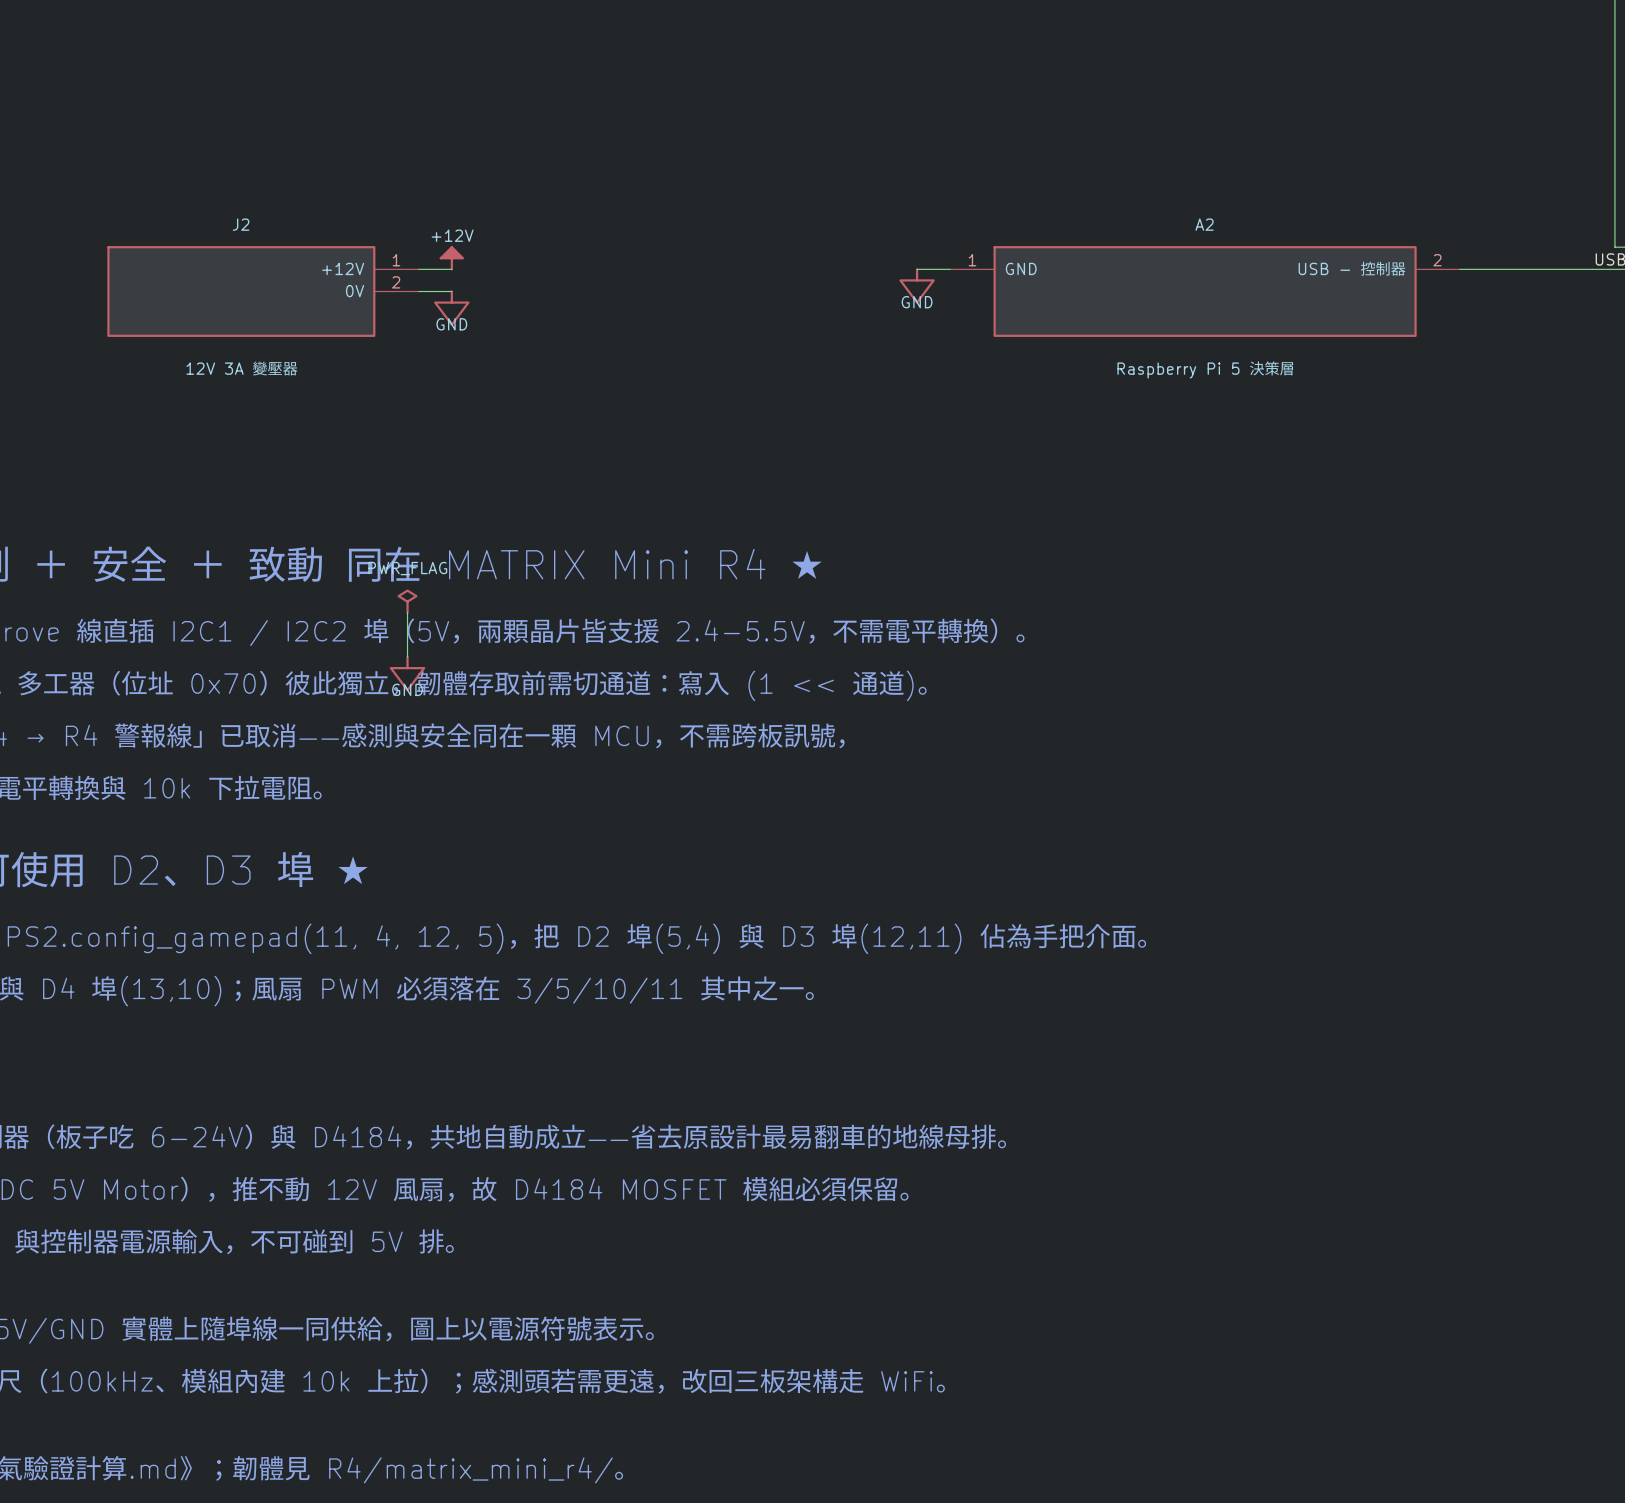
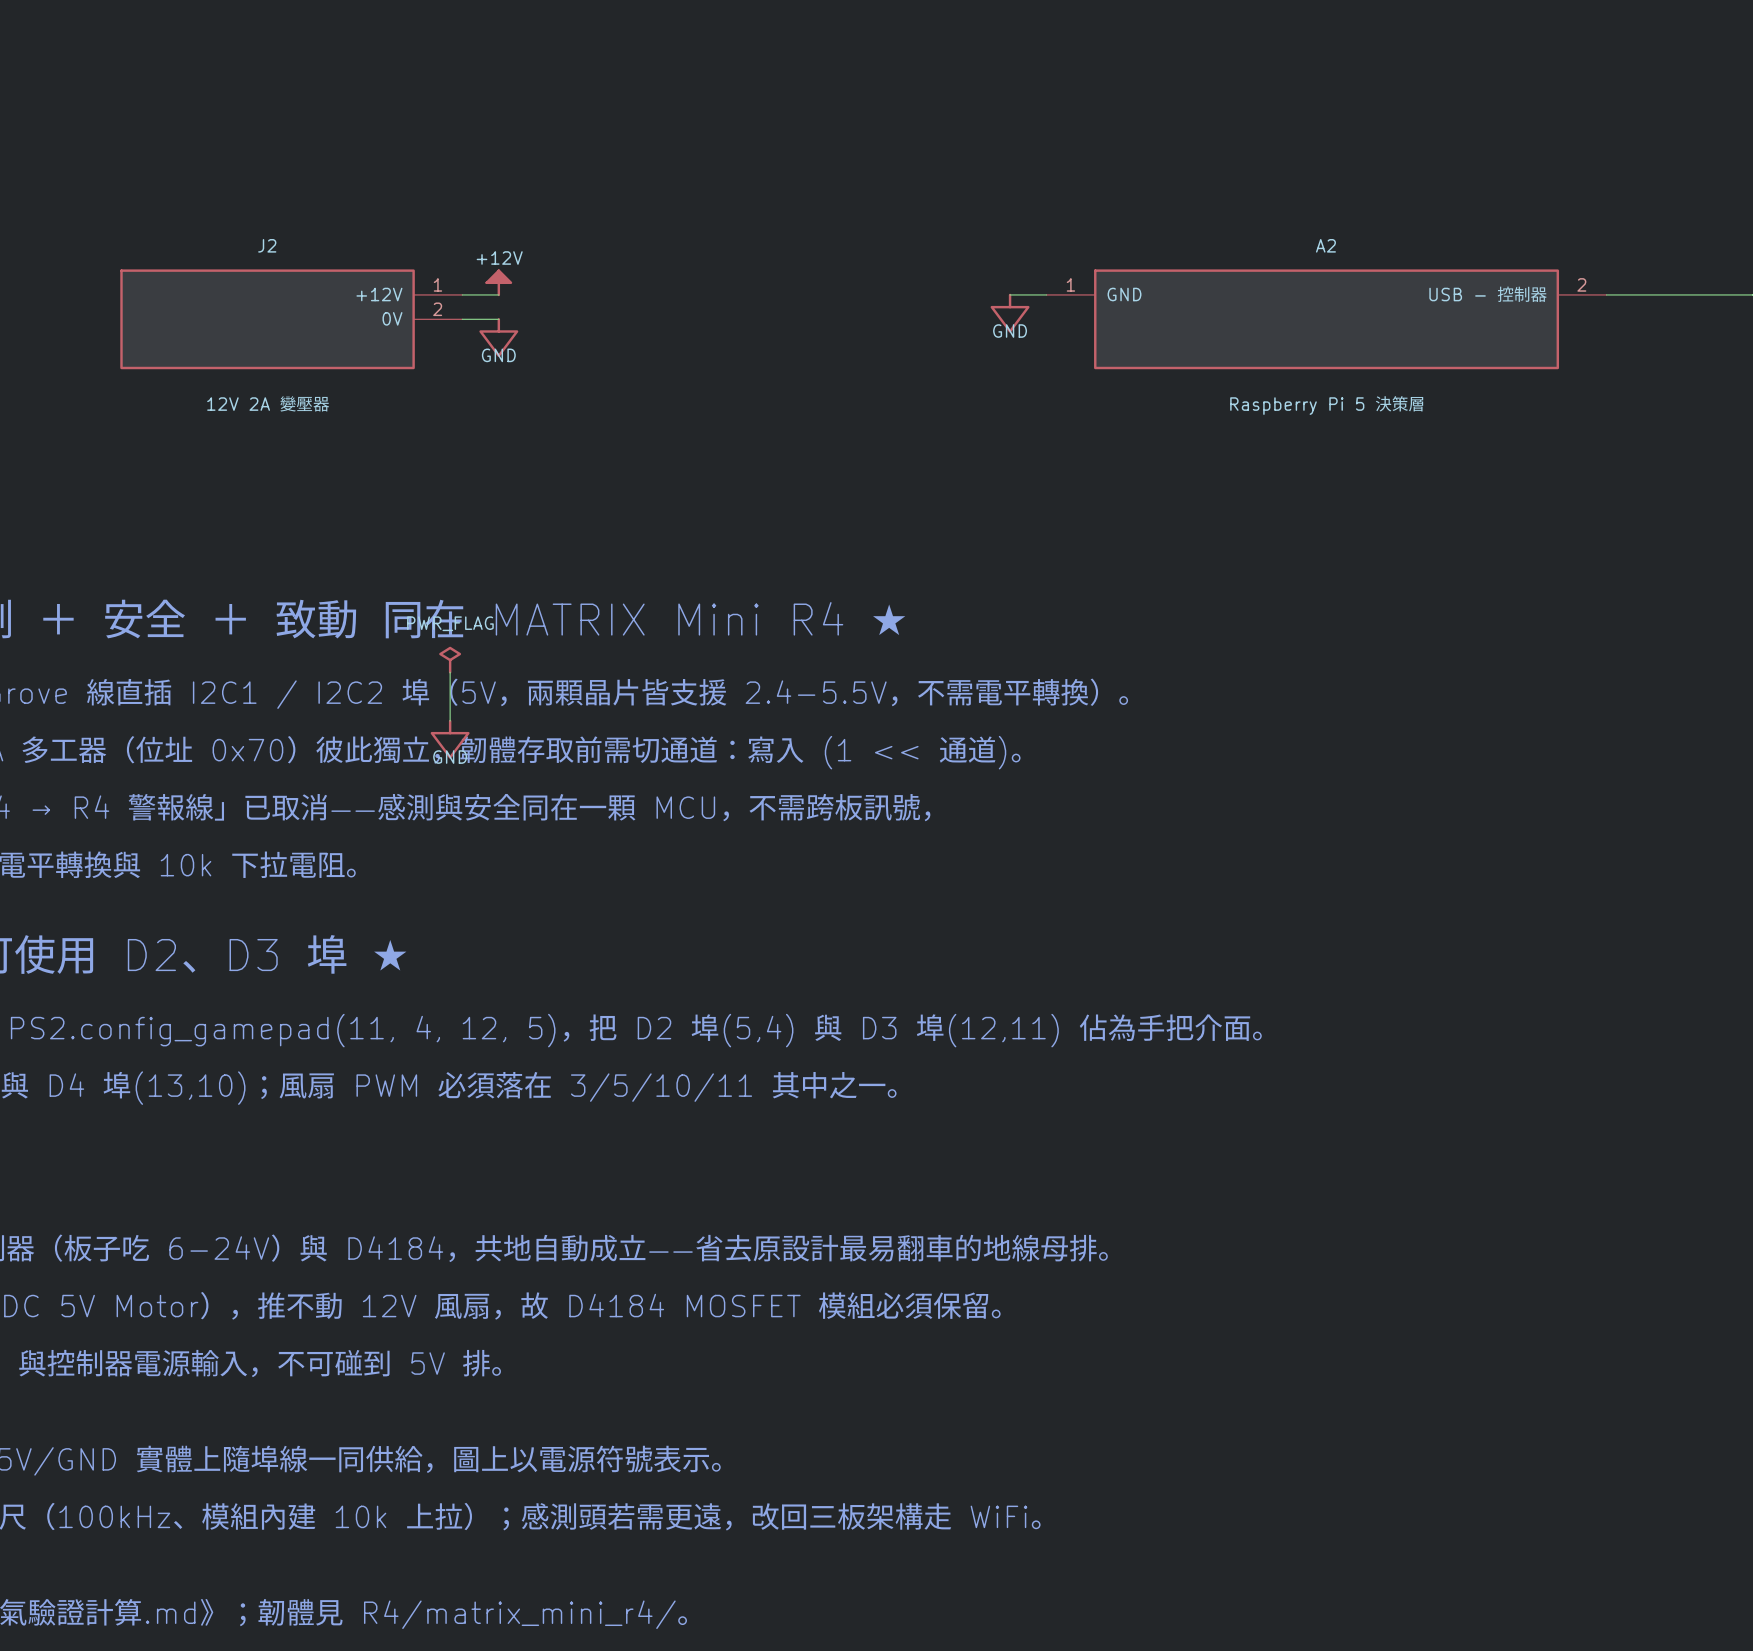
J2 value: 12V 3A 變壓器 (242, 368) -> 12V 2A 變壓器 (268, 403)

